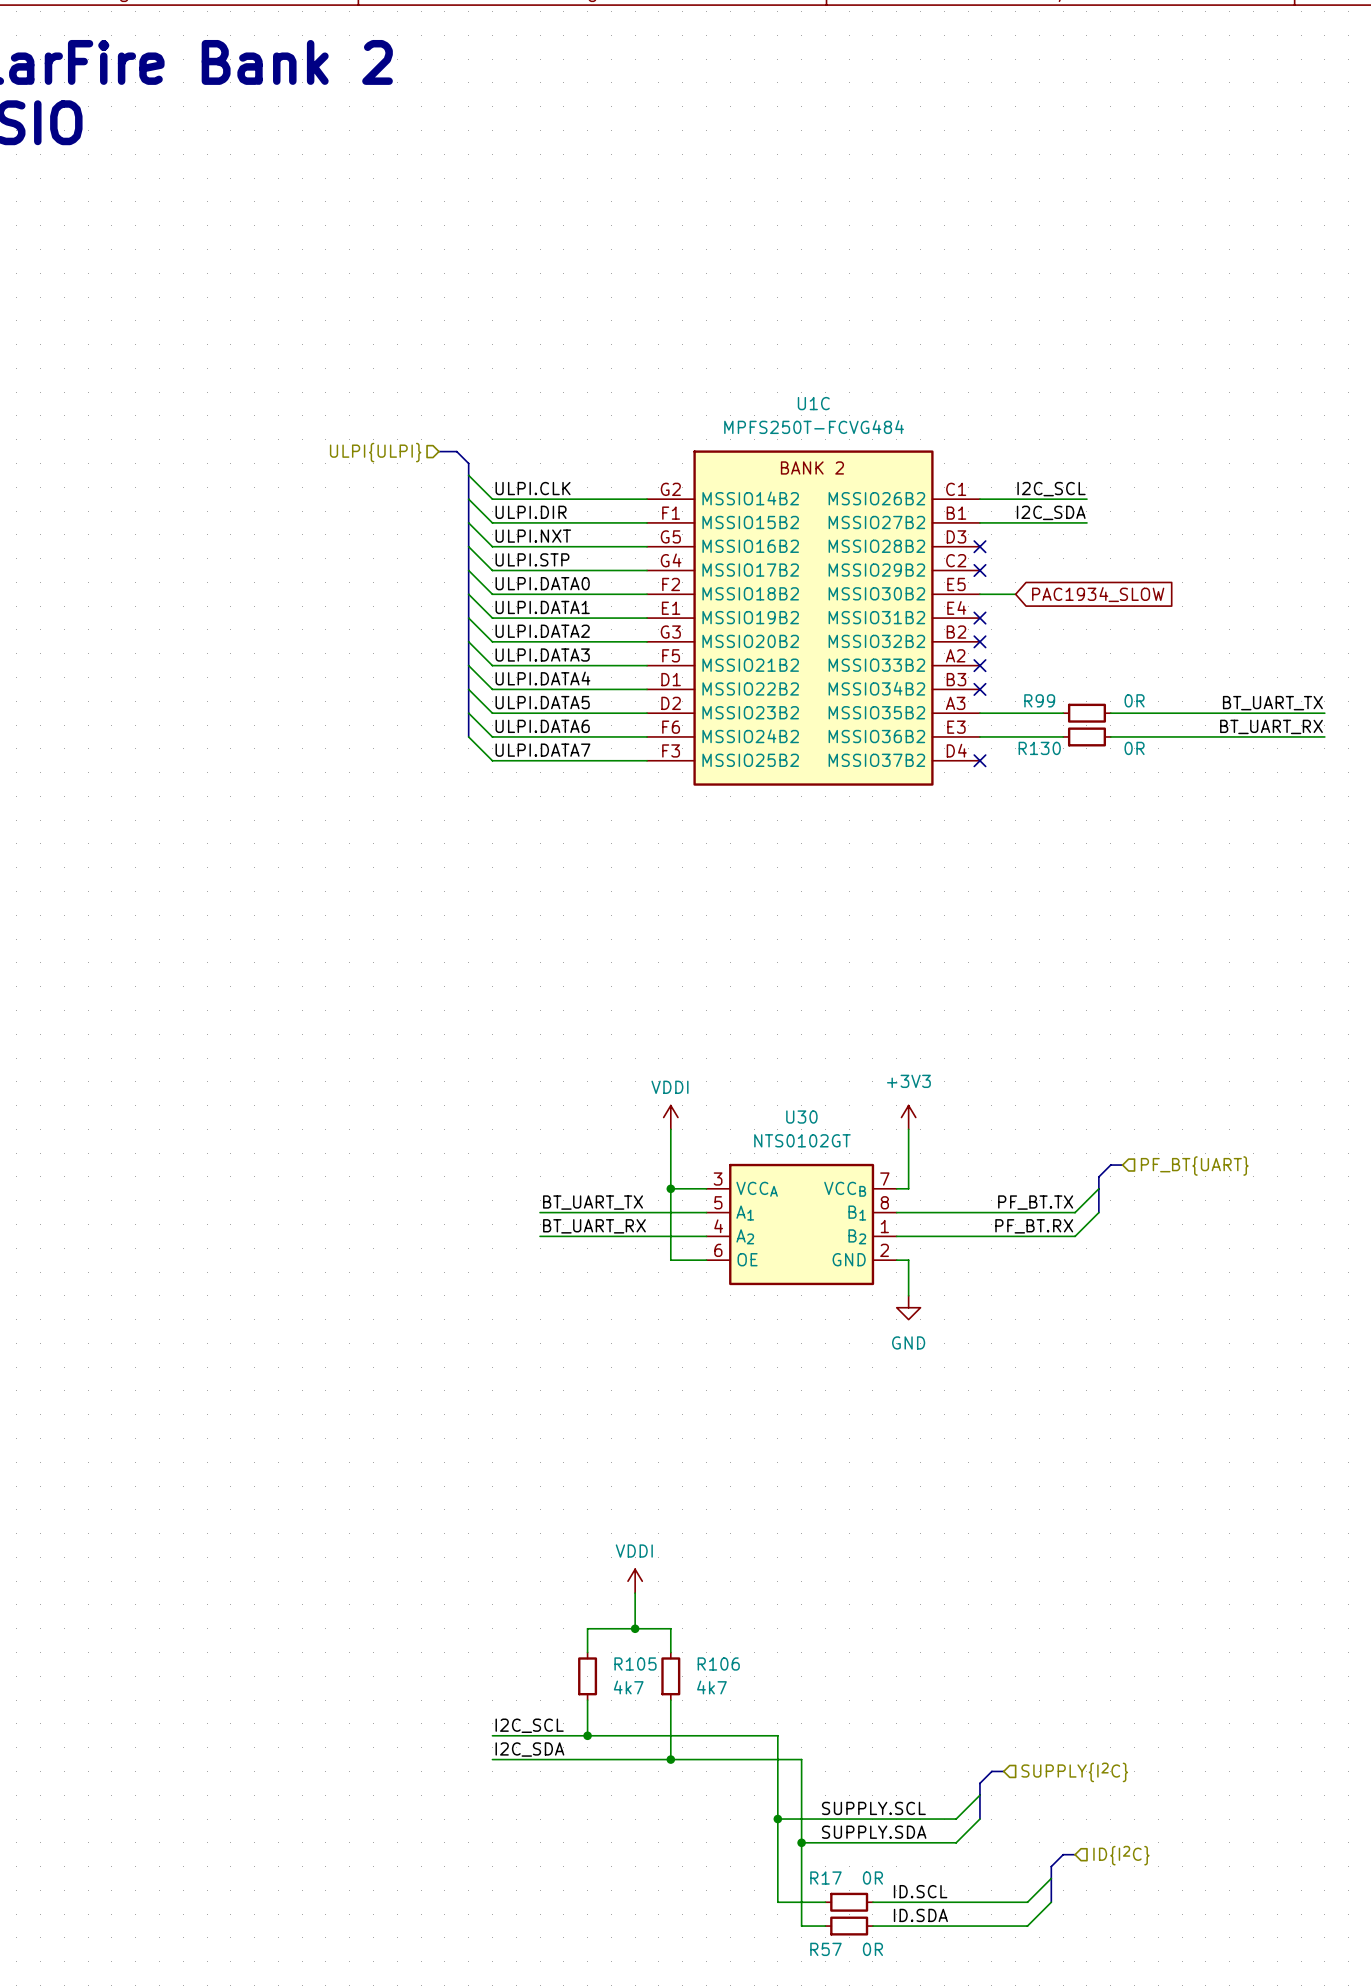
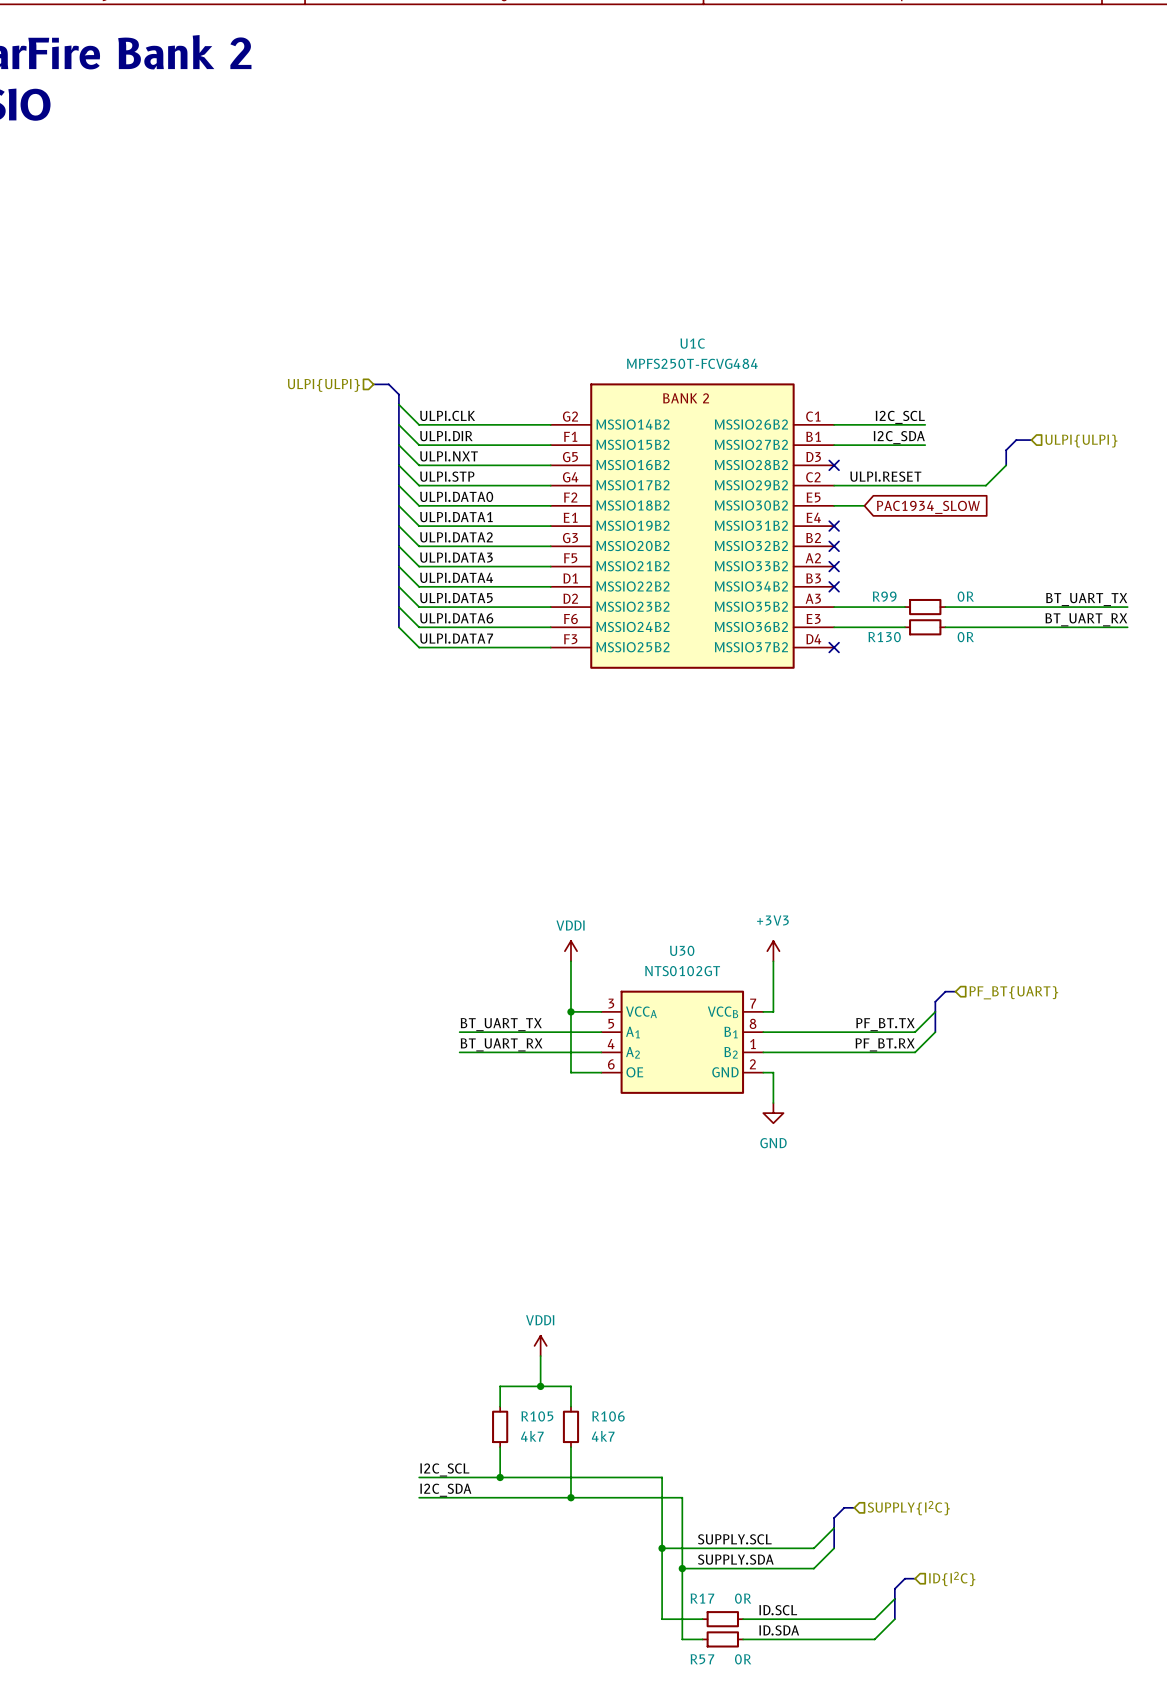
bus: none -> (1031, 440) (1016, 440) (1006, 450) (1006, 465)
hierarchical label: none -> ULPI{ULPI} (1081, 441)
wire: none -> (1006, 465) (985, 485) (834, 485)
label: none -> ULPI.RESET (885, 476)
no-connect mark: (979, 570) -> none

